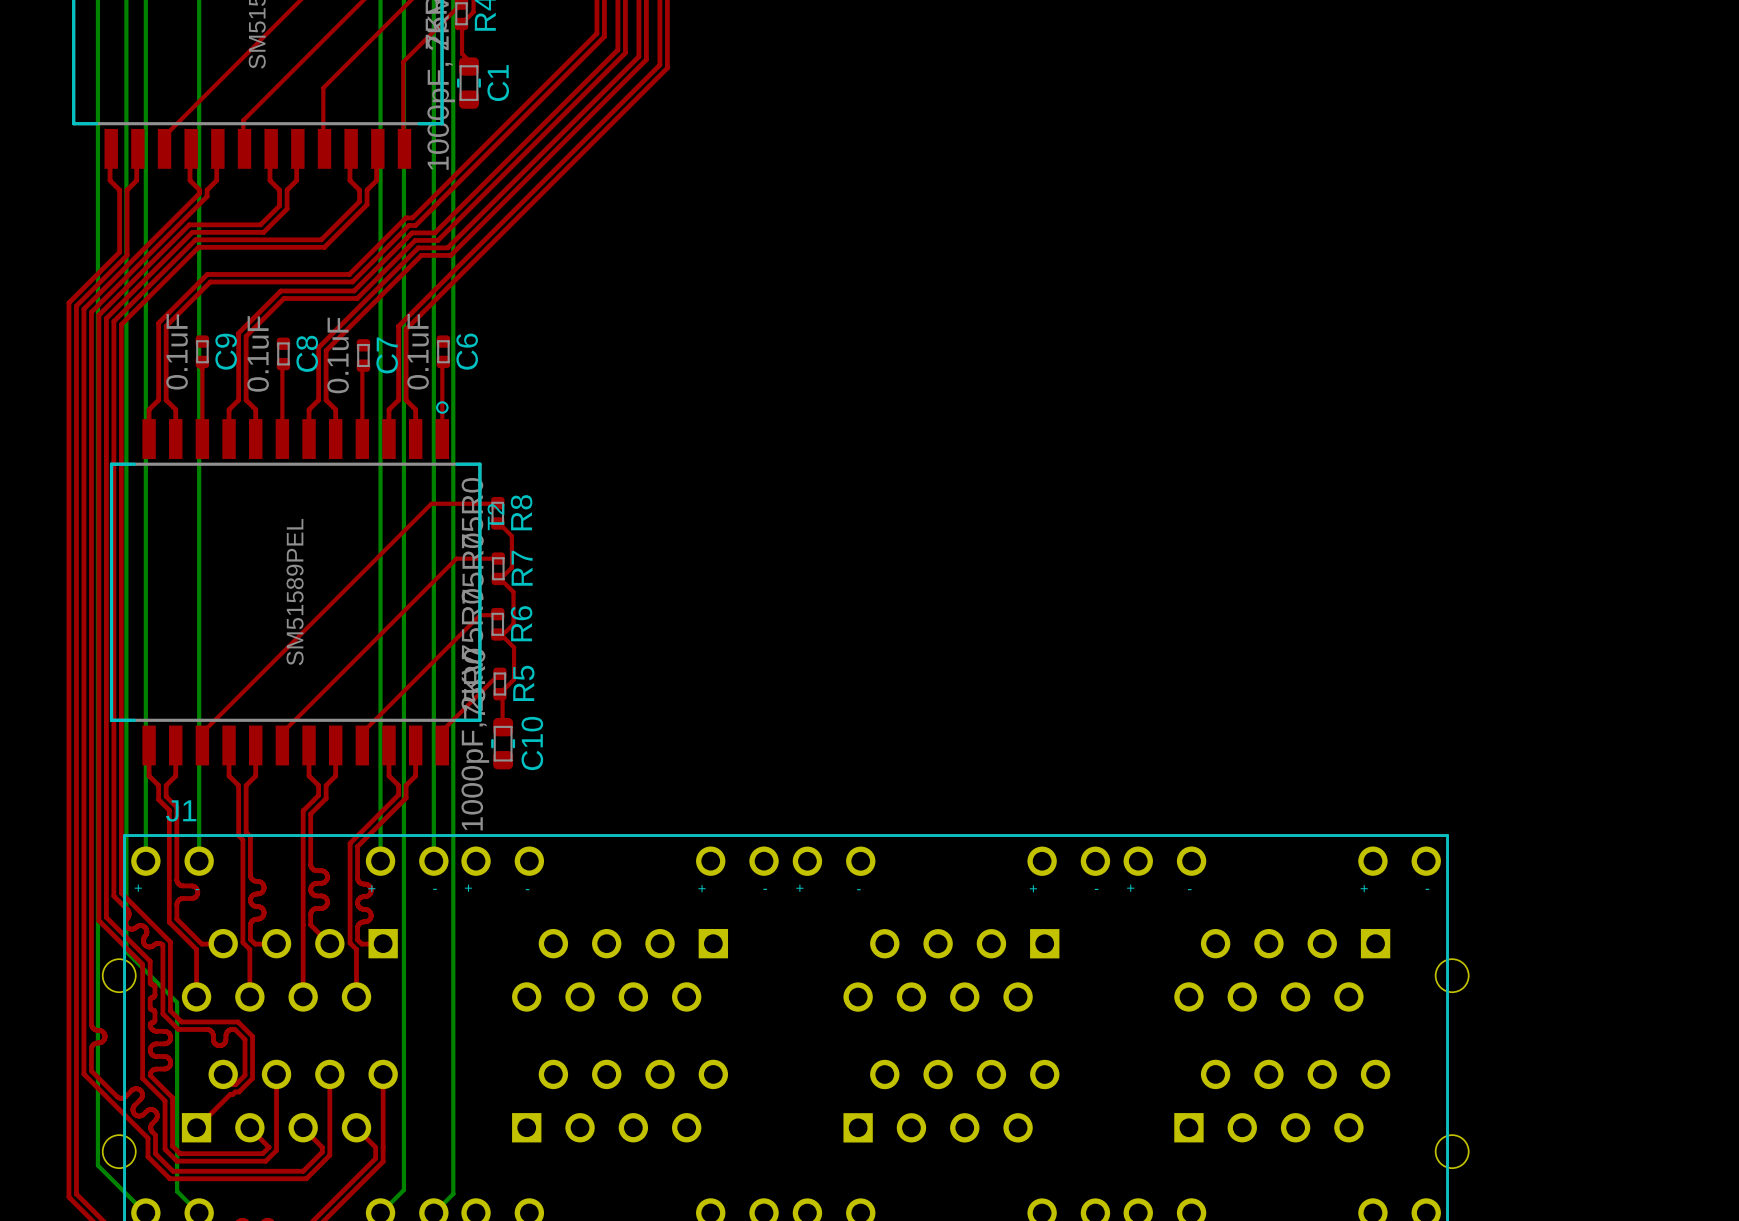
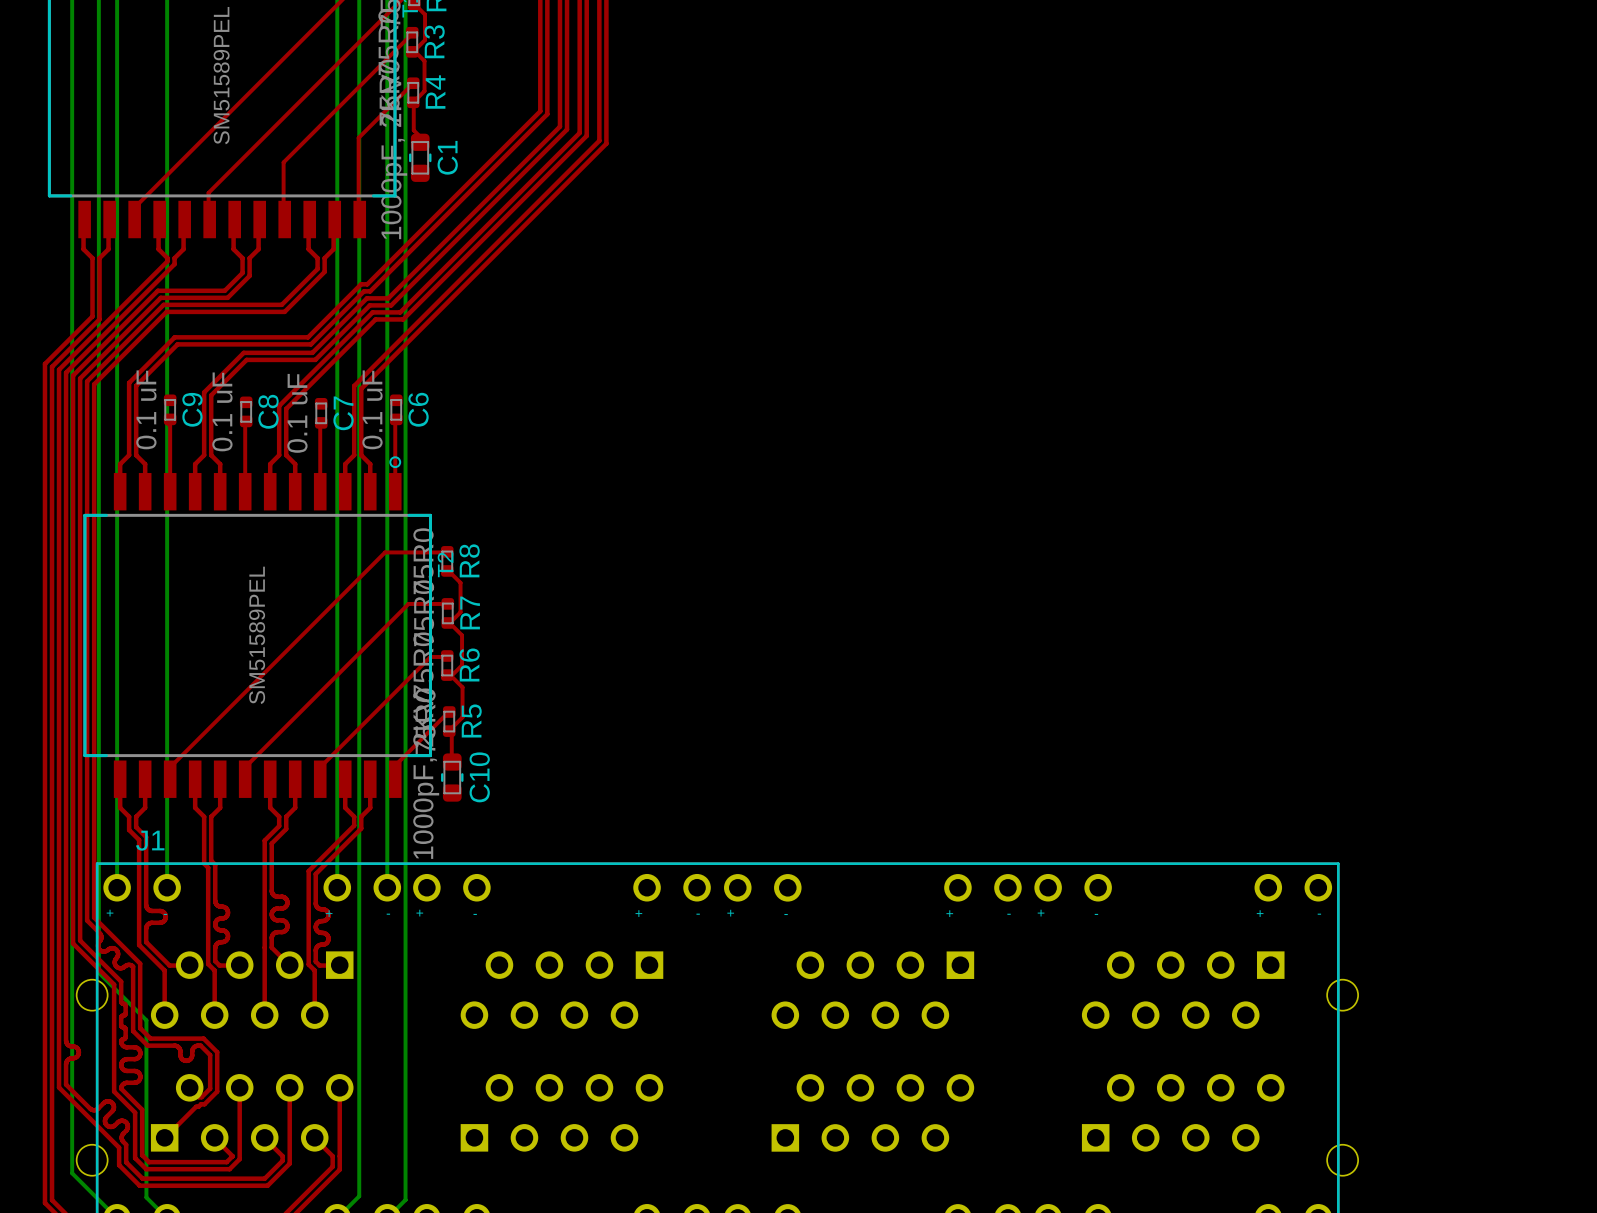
C9 value: 0.1uF (177, 351) -> 0.1 uF (146, 409)
C6 value: 0.1uF (418, 351) -> 0.1 uF (372, 409)
C8 value: 0.1uF (258, 353) -> 0.1 uF (222, 411)
C7 value: 0.1uF (338, 355) -> 0.1 uF (297, 413)

